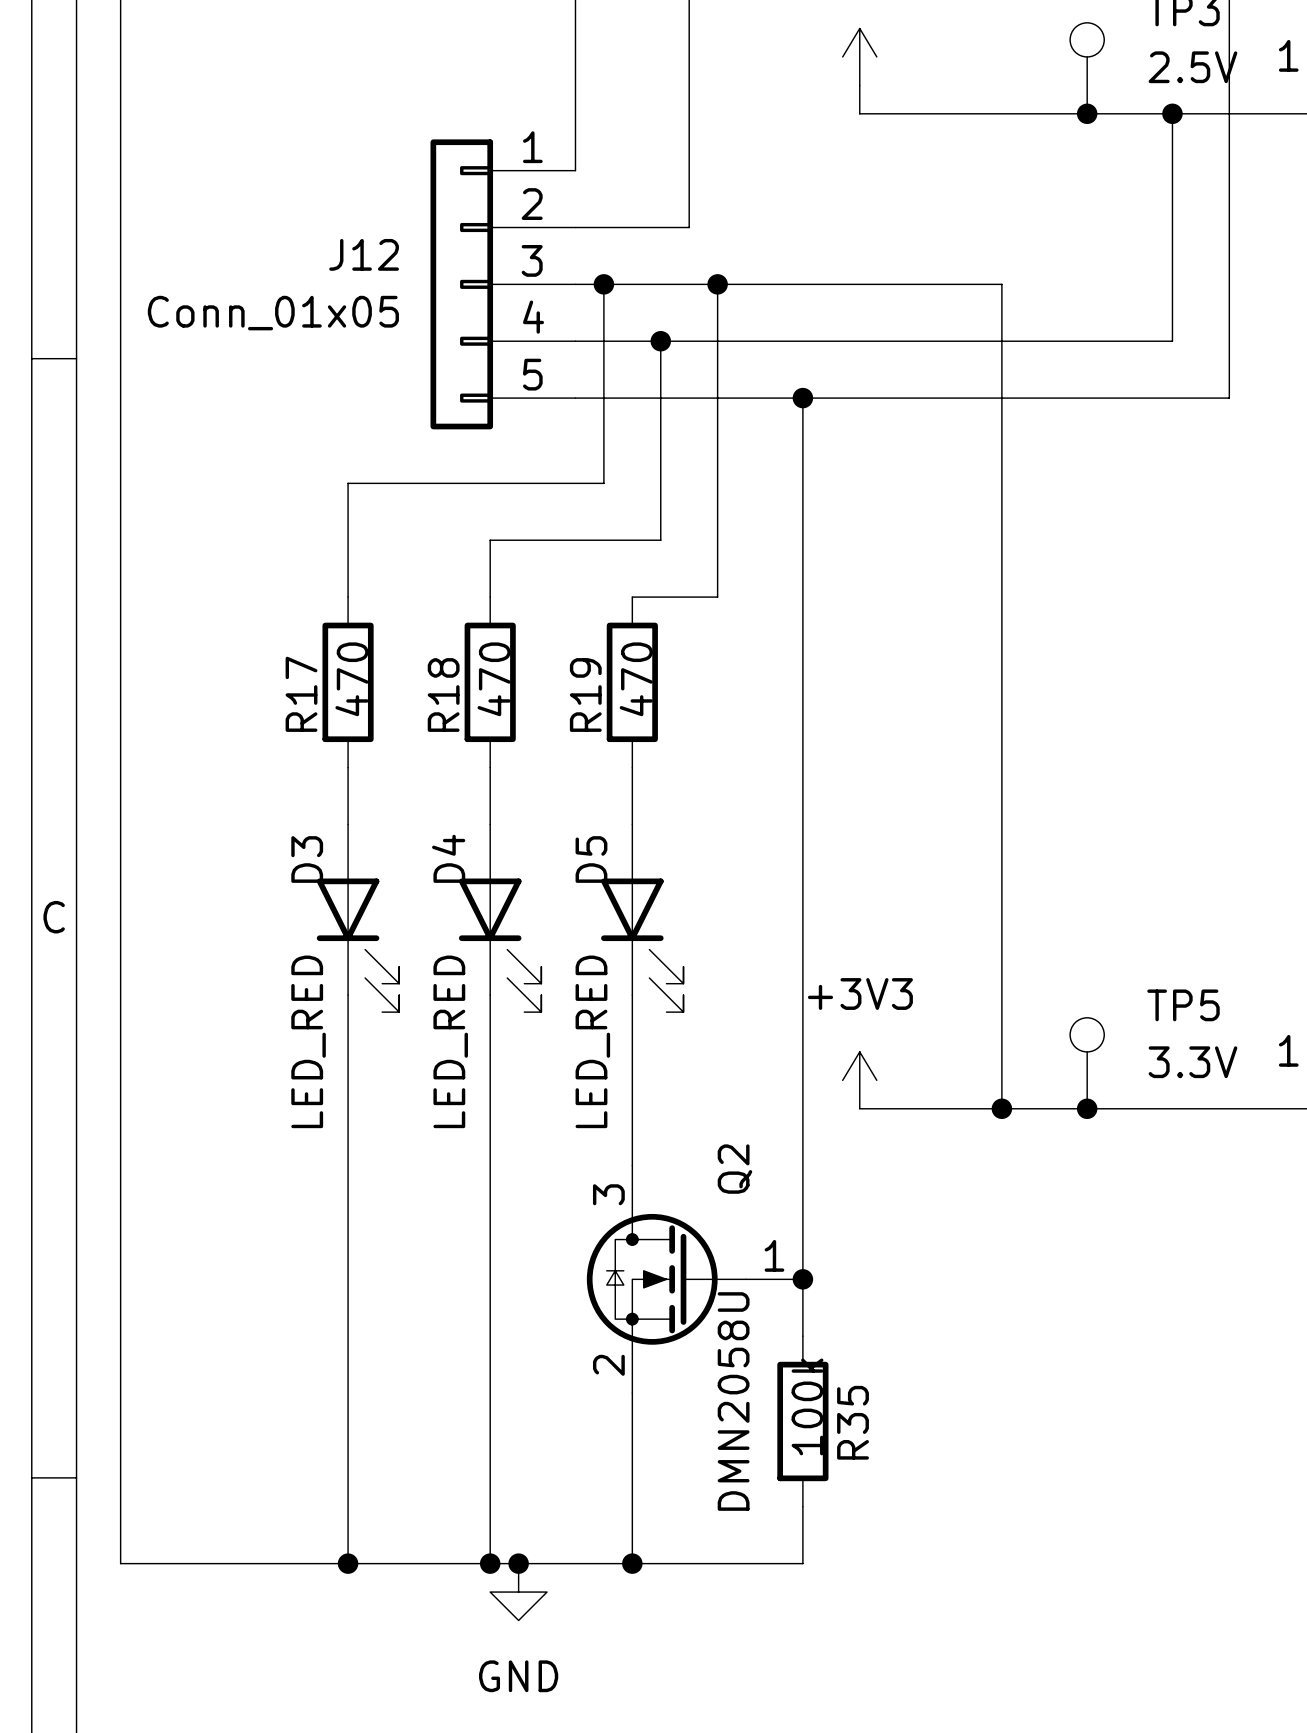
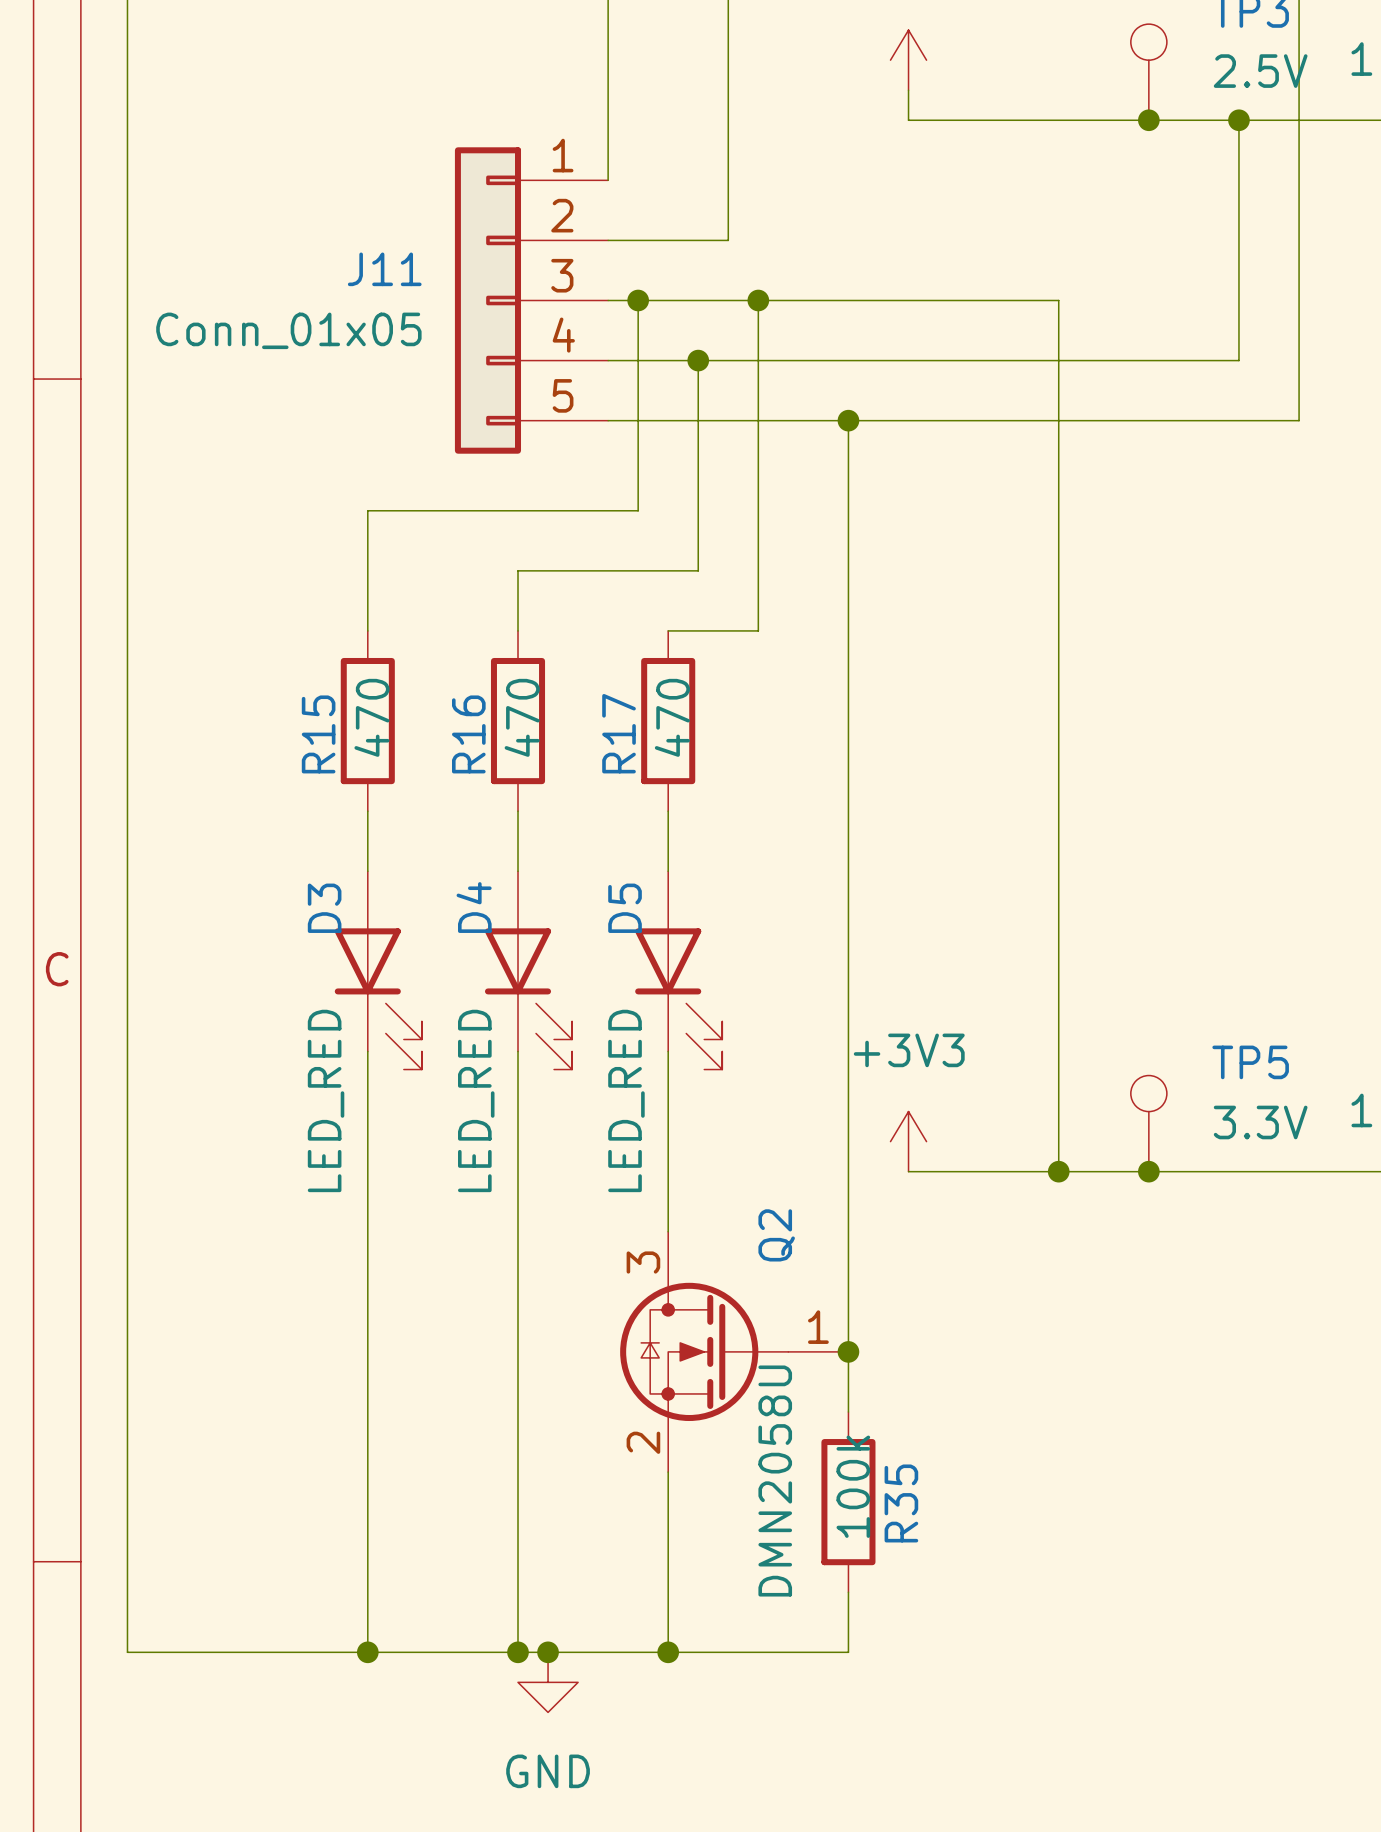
J12 name: J12 (364, 254) -> J11 (384, 269)
R17 name: R17 (301, 694) -> R15 (318, 734)
R18 name: R18 (443, 695) -> R16 (468, 734)
R19 name: R19 (585, 695) -> R17 (619, 733)

